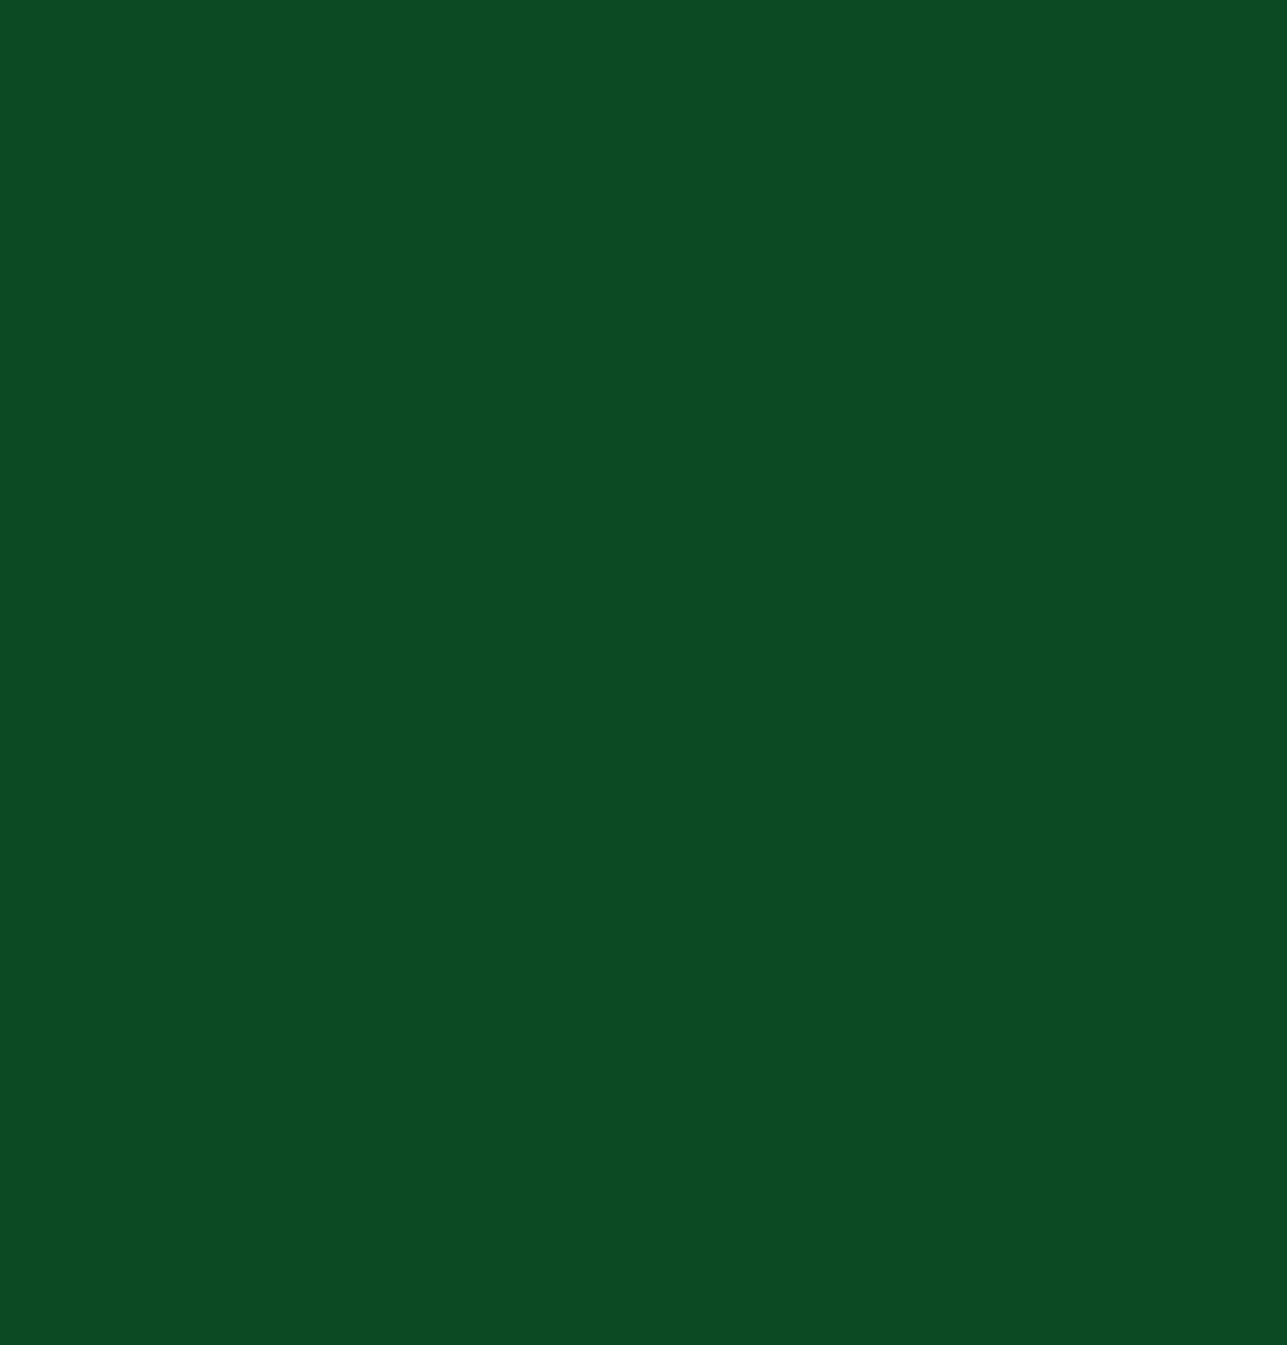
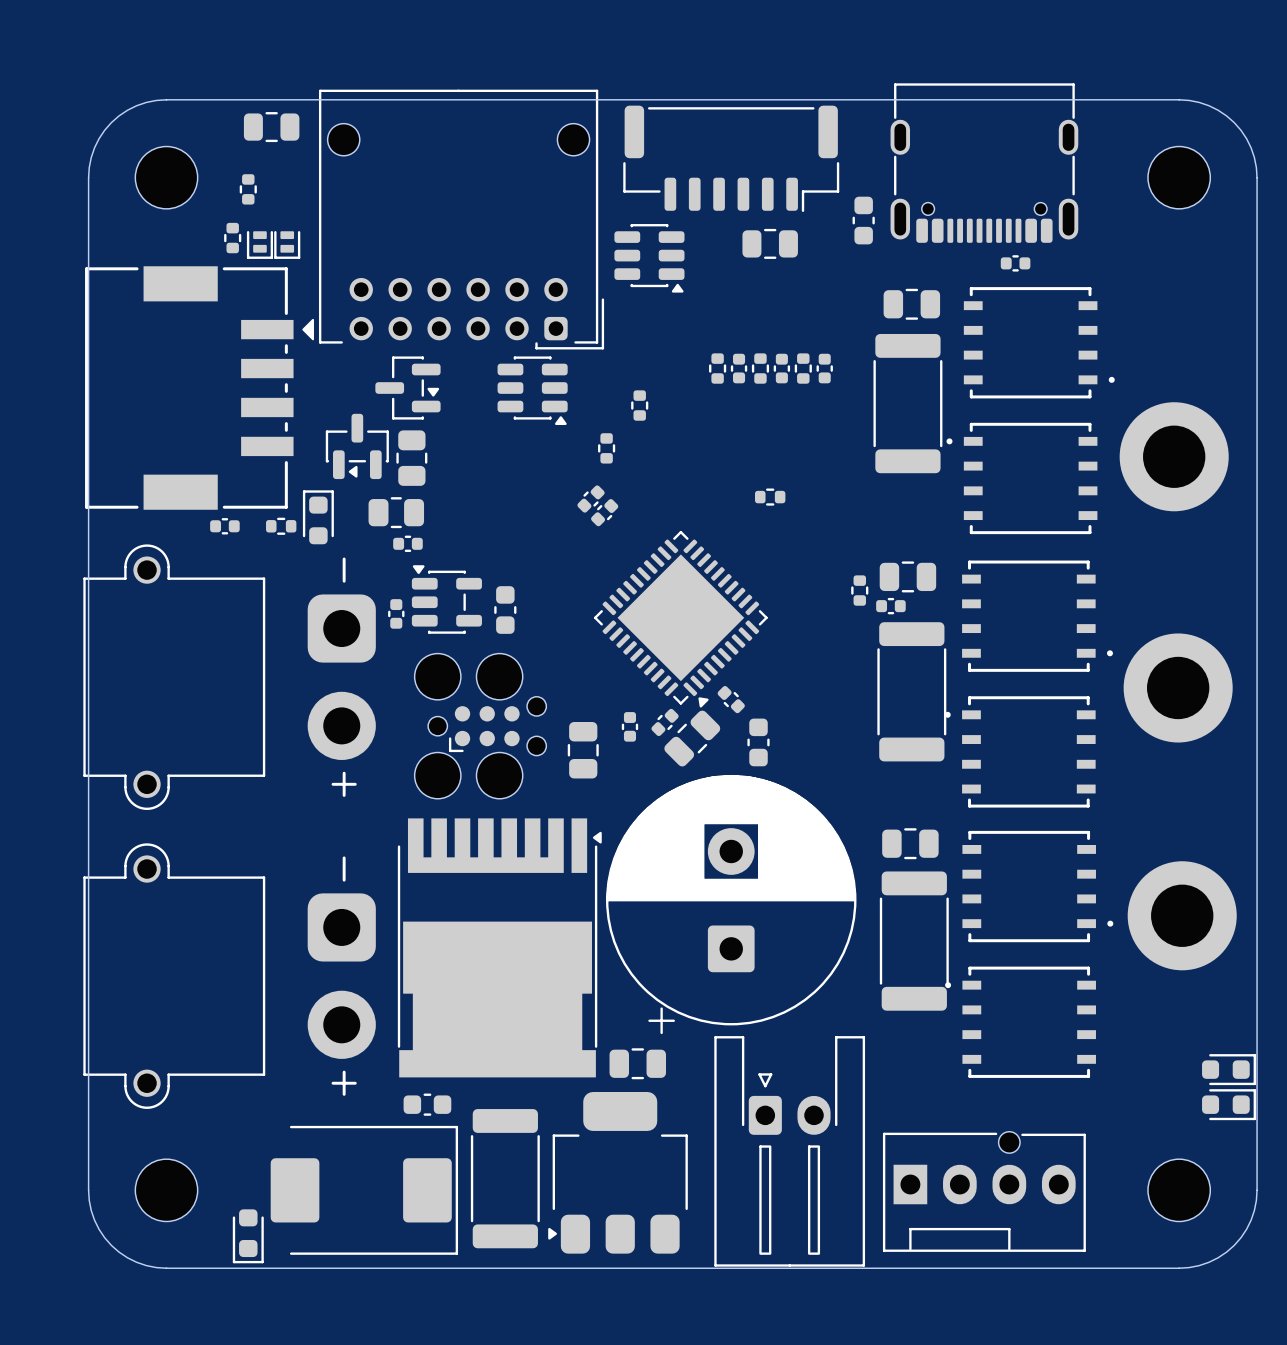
board edge: none -> (166, 99) (1179, 99) (1208, 105) (1234, 122) (1251, 147) (1257, 177) (1257, 1190) (1251, 1220) (1234, 1245) (1208, 1262) (1179, 1268) (166, 1268) (136, 1262) (111, 1245) (94, 1220) (88, 1190) (88, 177) (94, 147) (111, 122) (136, 105) (166, 99)
part: none -> (271, 127)
part: none -> (731, 158)
part: none -> (984, 163)
part: none -> (166, 177)
part: none -> (1179, 177)
part: none -> (248, 189)
part: none -> (461, 219)
part: none -> (863, 220)
part: none -> (232, 238)
part: none -> (770, 243)
part: none -> (259, 244)
part: none -> (287, 244)
part: none -> (649, 258)
part: none -> (1015, 263)
part: none -> (911, 304)
part: none -> (1039, 342)
part: none -> (717, 368)
part: none -> (739, 368)
part: none -> (760, 368)
part: none -> (781, 368)
part: none -> (803, 368)
part: none -> (824, 368)
part: none -> (199, 388)
part: none -> (407, 388)
part: none -> (532, 390)
part: none -> (907, 403)
part: none -> (639, 405)
part: none -> (357, 446)
part: none -> (606, 448)
part: none -> (1174, 456)
part: none -> (411, 458)
part: none -> (1021, 478)
part: none -> (770, 497)
part: none -> (591, 499)
part: none -> (396, 512)
part: none -> (604, 512)
part: none -> (318, 517)
part: none -> (224, 526)
part: none -> (281, 526)
part: none -> (407, 543)
part: none -> (907, 576)
part: none -> (859, 590)
part: none -> (446, 599)
part: none -> (890, 606)
part: none -> (505, 610)
part: none -> (396, 613)
part: none -> (1037, 616)
part: none -> (680, 619)
part: none -> (229, 677)
part: none -> (1178, 687)
part: none -> (911, 691)
part: none -> (731, 699)
part: none -> (665, 722)
part: none -> (480, 726)
part: none -> (629, 726)
part: none -> (692, 738)
part: none -> (758, 742)
part: none -> (583, 750)
part: none -> (1020, 751)
part: none -> (910, 843)
part: none -> (1037, 886)
part: none -> (731, 904)
part: none -> (1182, 915)
part: none -> (914, 941)
part: none -> (499, 947)
part: none -> (229, 976)
part: none -> (1020, 1022)
part: none -> (637, 1063)
part: none -> (1229, 1069)
part: none -> (427, 1104)
part: none -> (1229, 1104)
part: none -> (789, 1151)
part: none -> (618, 1172)
part: none -> (505, 1178)
part: none -> (166, 1190)
part: none -> (364, 1190)
part: none -> (1179, 1190)
part: none -> (984, 1191)
part: none -> (248, 1236)

